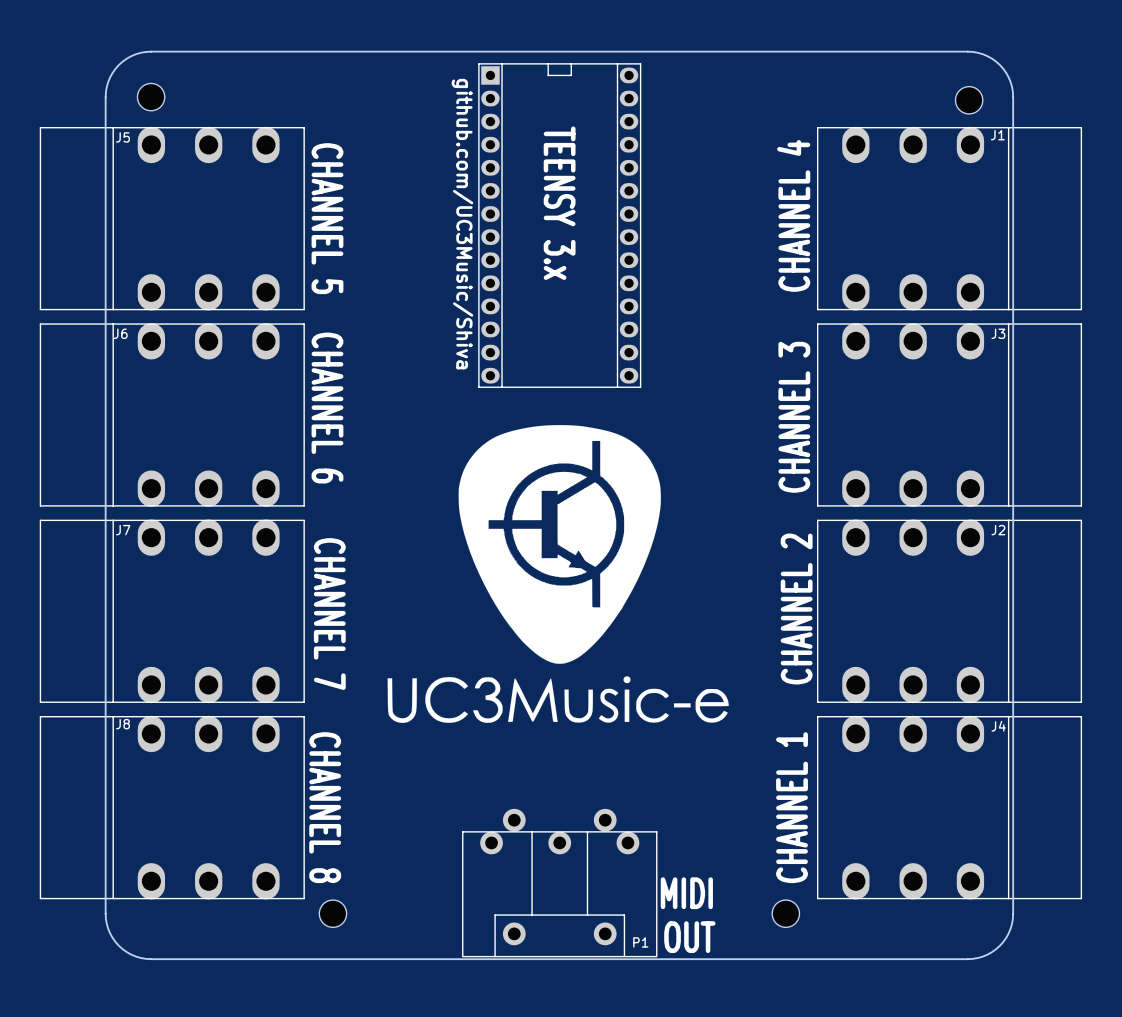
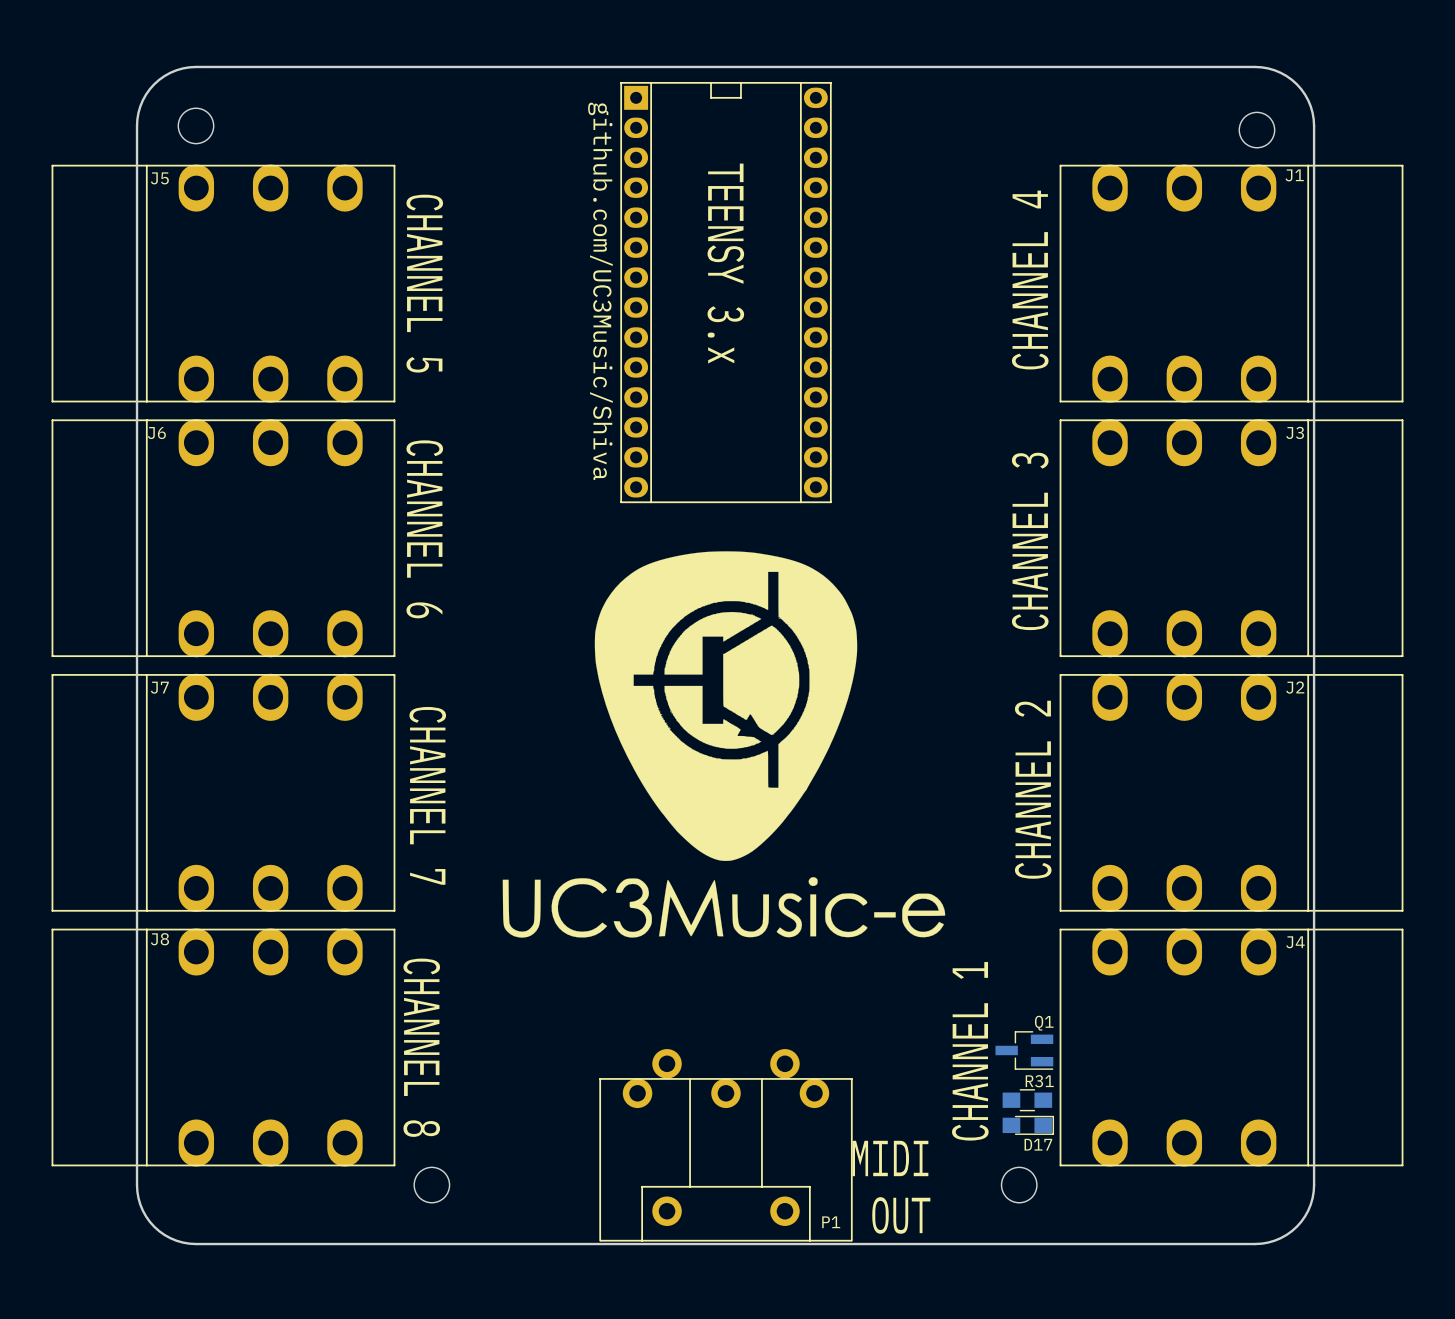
text position: CHANNEL 1 (792, 807) -> CHANNEL 1 (970, 1051)
Q1: none -> (1024, 1050)
R31: none -> (1027, 1100)
D17: none -> (1028, 1125)

